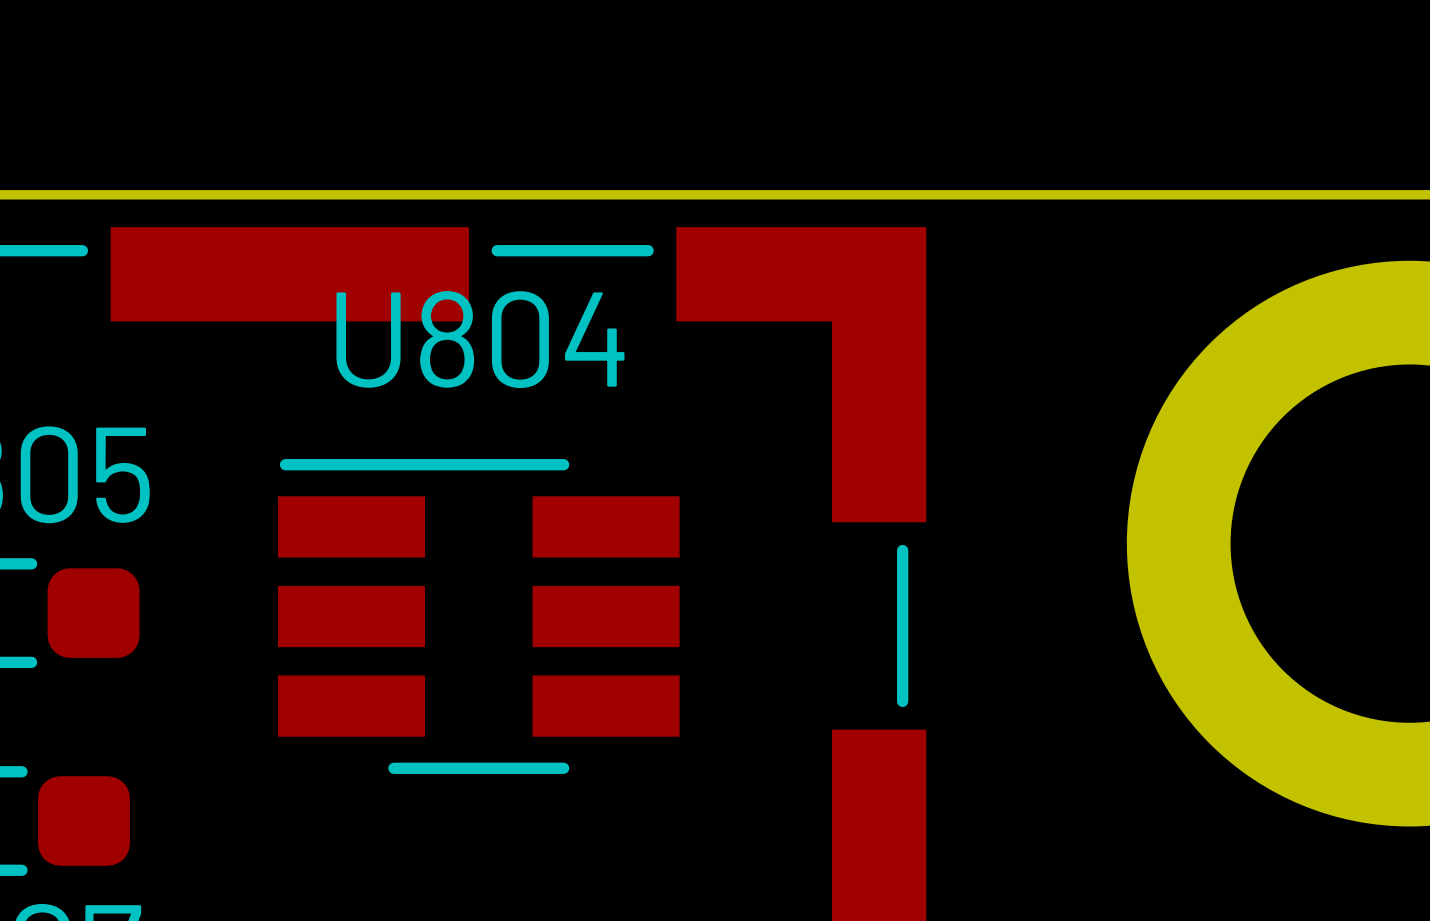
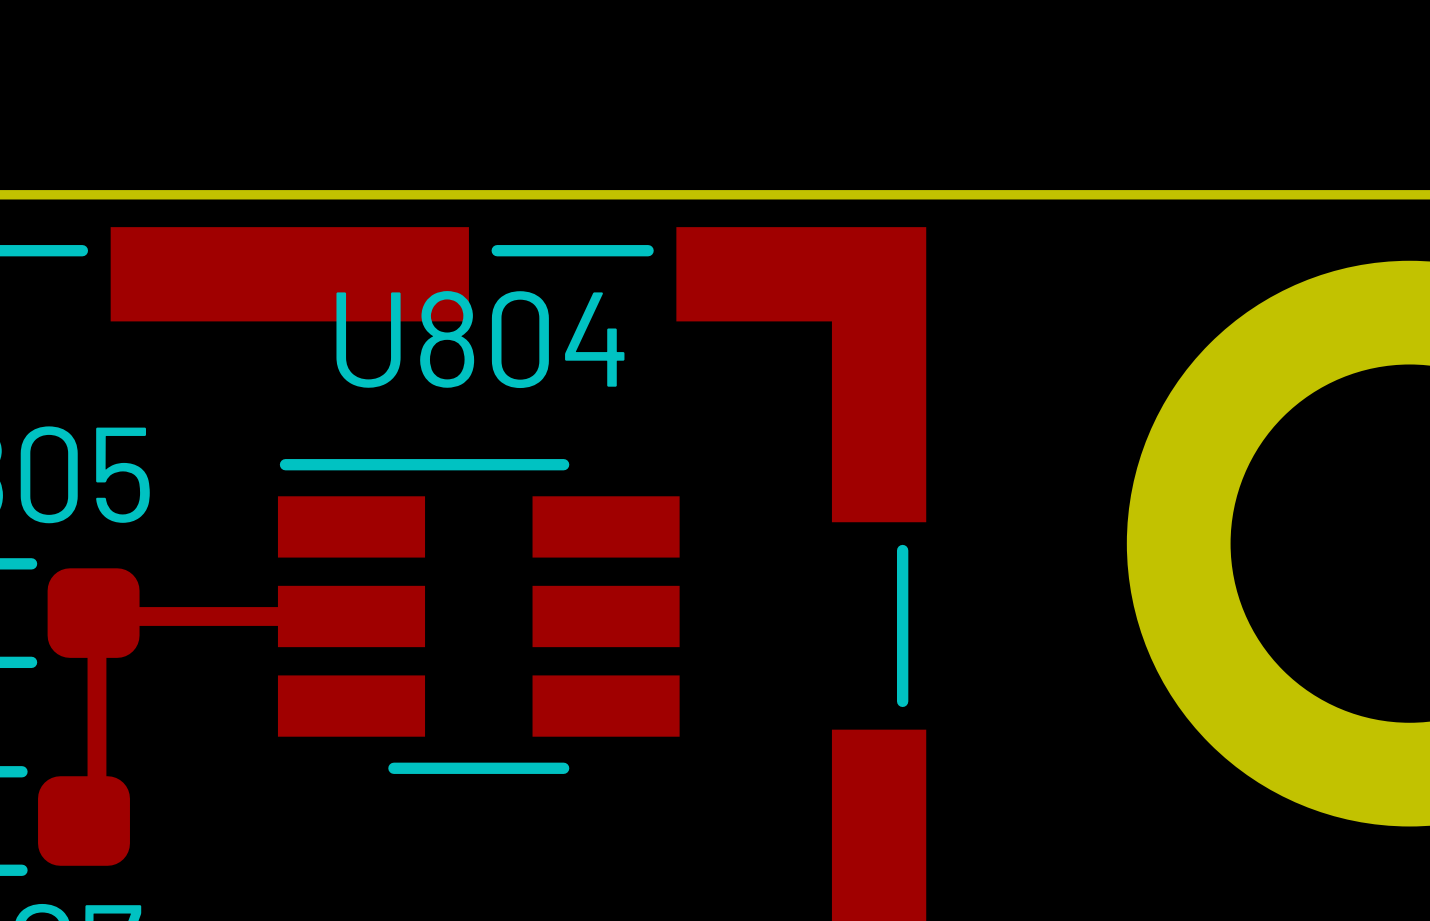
track: none -> (96, 616) (351, 616)
track: none -> (96, 616) (96, 808) (83, 821)

